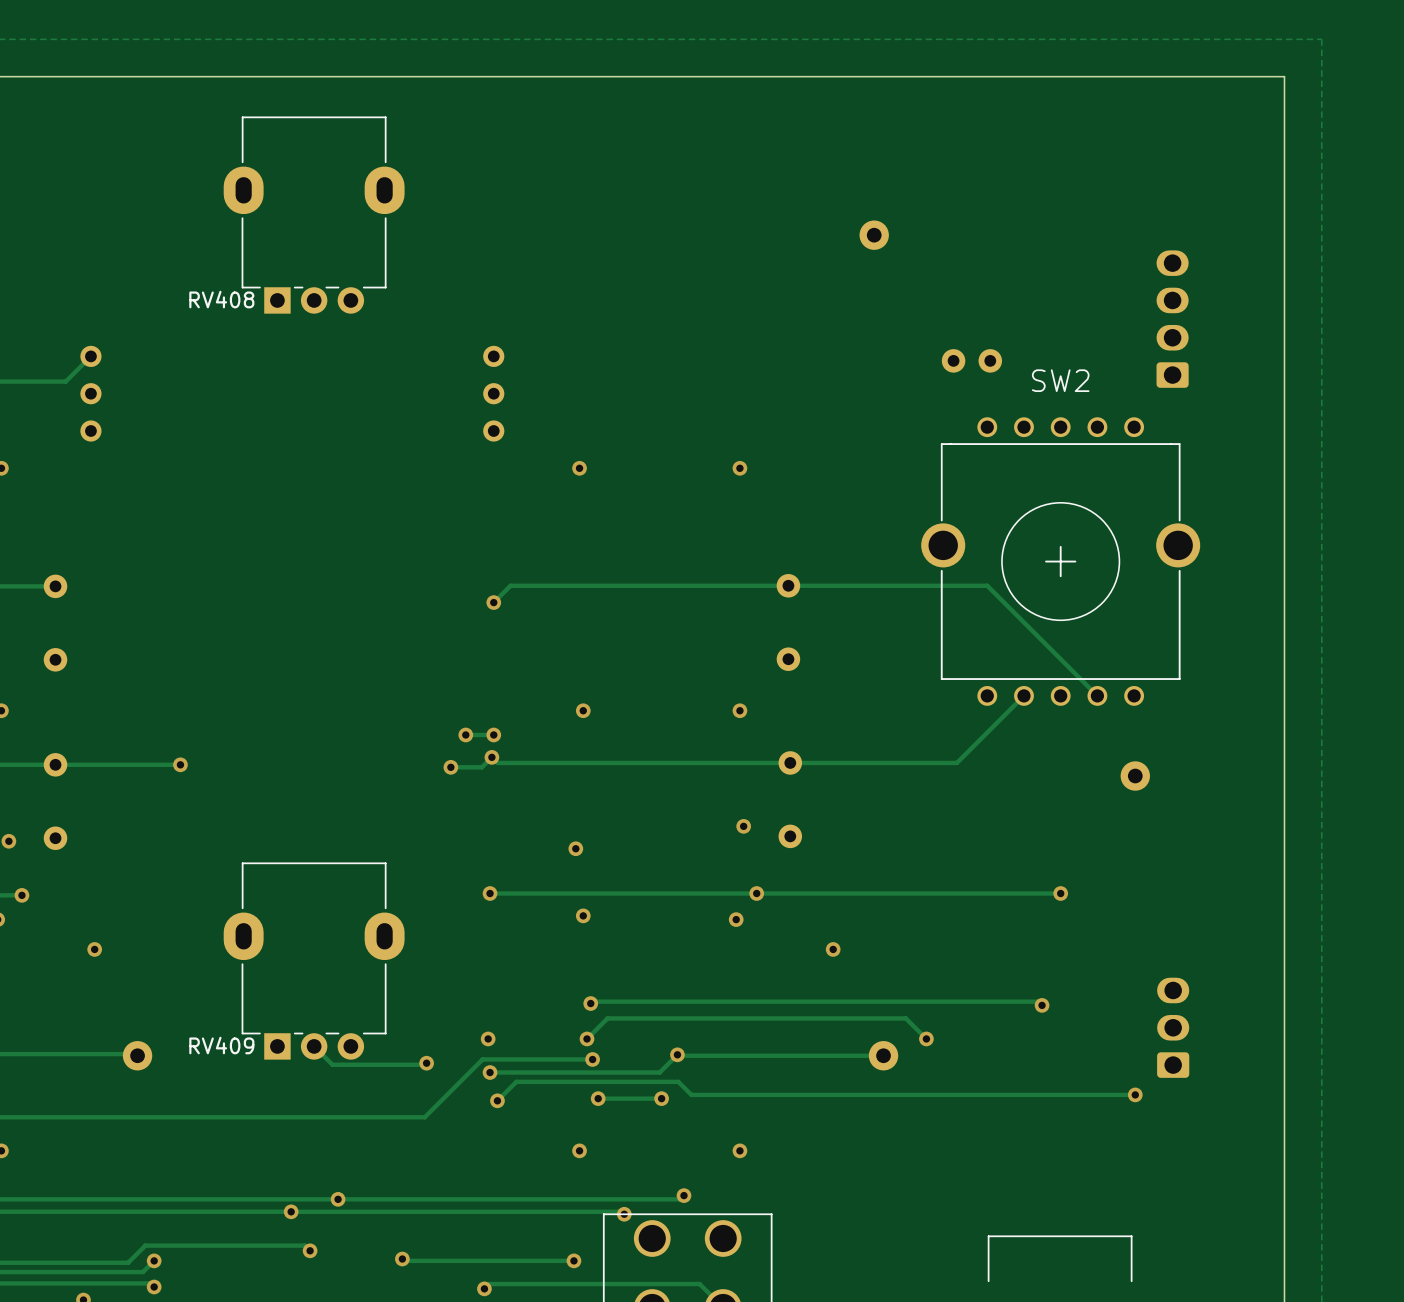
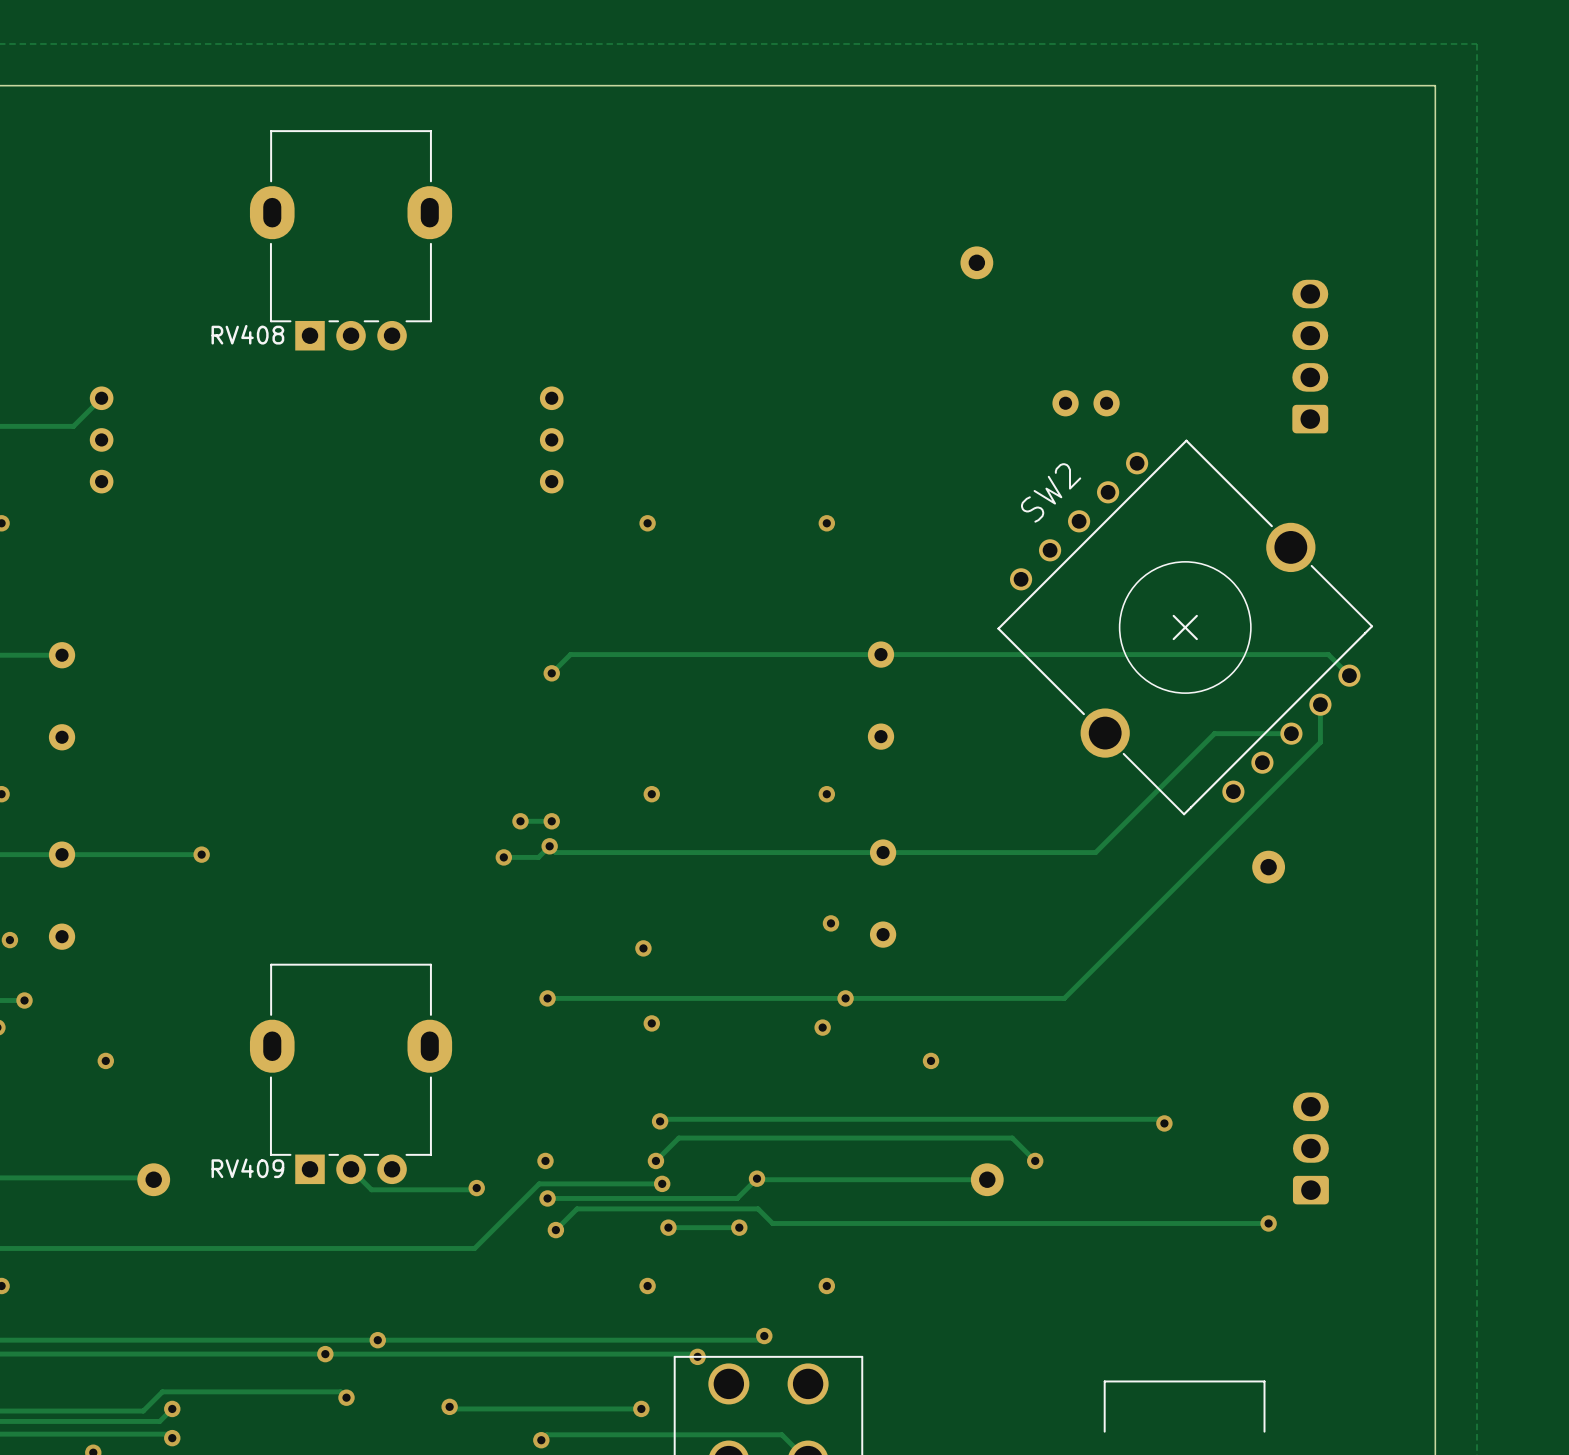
SW2 name position: SW2 (1060, 380) -> SW2 (1051, 492)
SW2 rotation: 0° (1060, 561) -> 135° clockwise (1185, 627)
track: (987, 585) (1097, 695) -> (1103, 654) (1328, 654) (1349, 675)
track: (1023, 695) (956, 762) -> (1291, 733) (1214, 733) (1095, 852) (1069, 852)
track: (952, 893) (1060, 893) -> (1064, 998) (1320, 742) (1320, 704)
via: (1060, 893) -> none

